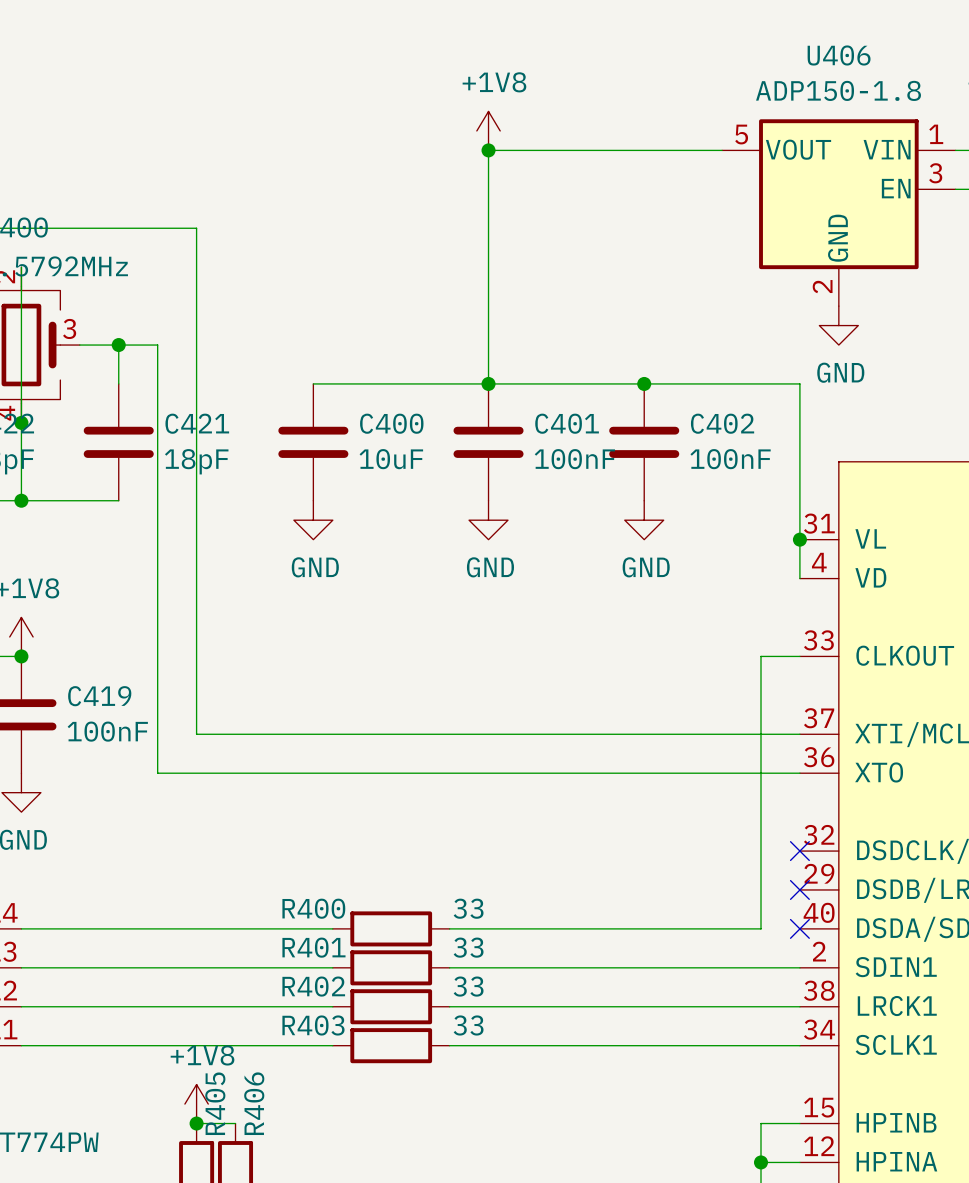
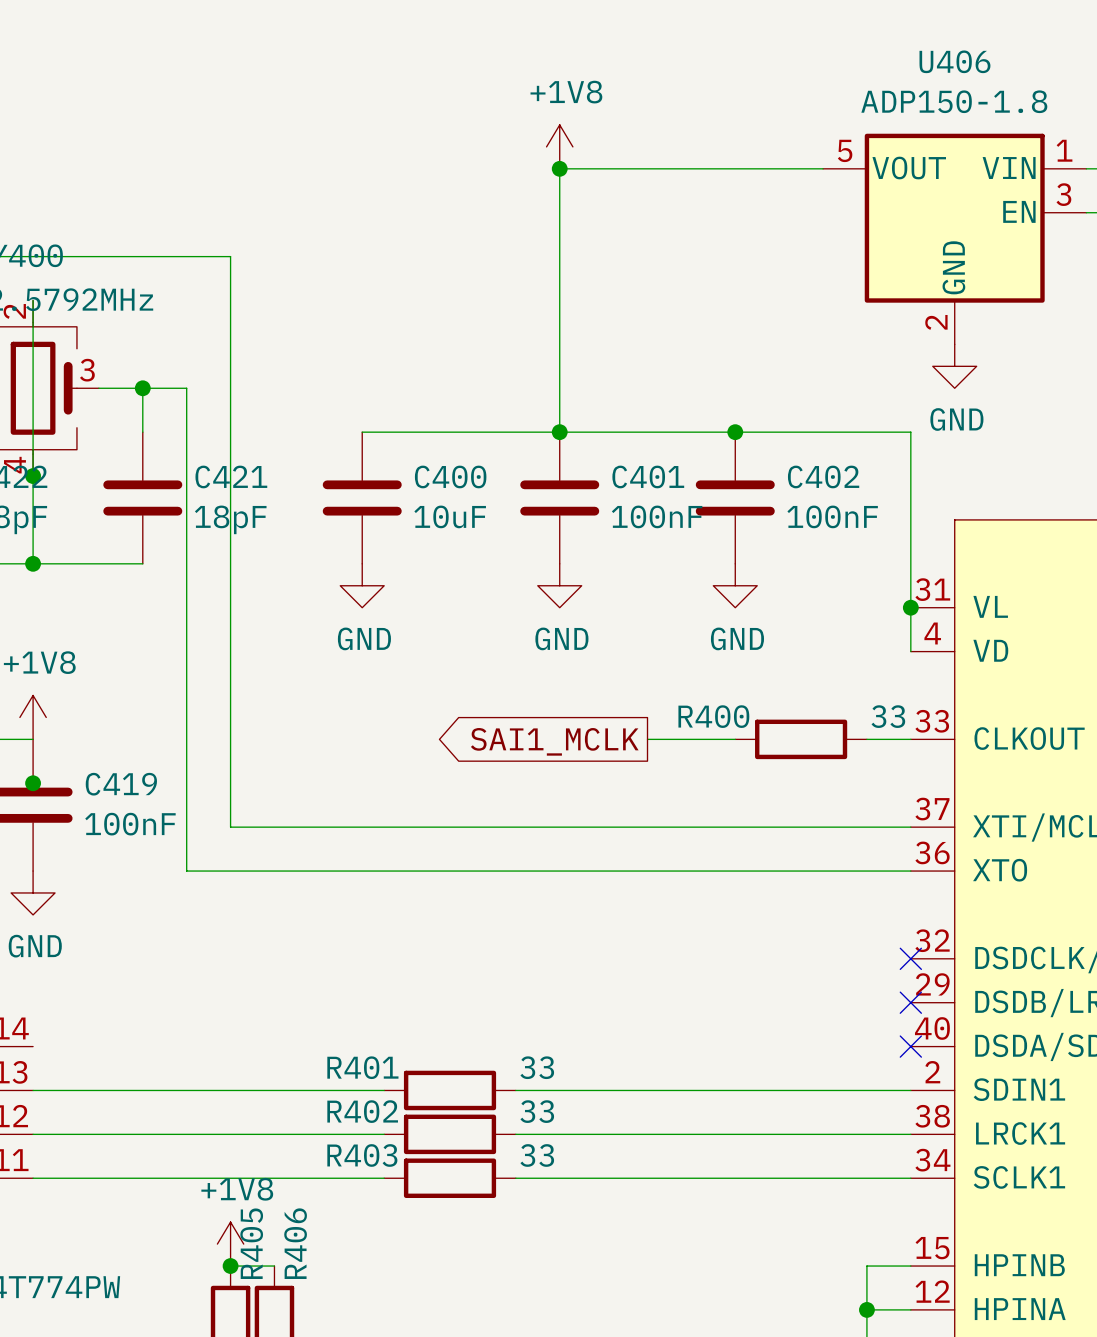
junction position: (21, 656) -> (33, 783)
wire: none -> (647, 739) (735, 739)
wire: (761, 656) (761, 928) (449, 928) -> none
global label: none -> SAI1_MCLK (554, 741)
wire: (21, 928) (332, 928) -> none
R400 position: (391, 928) -> (801, 739)

